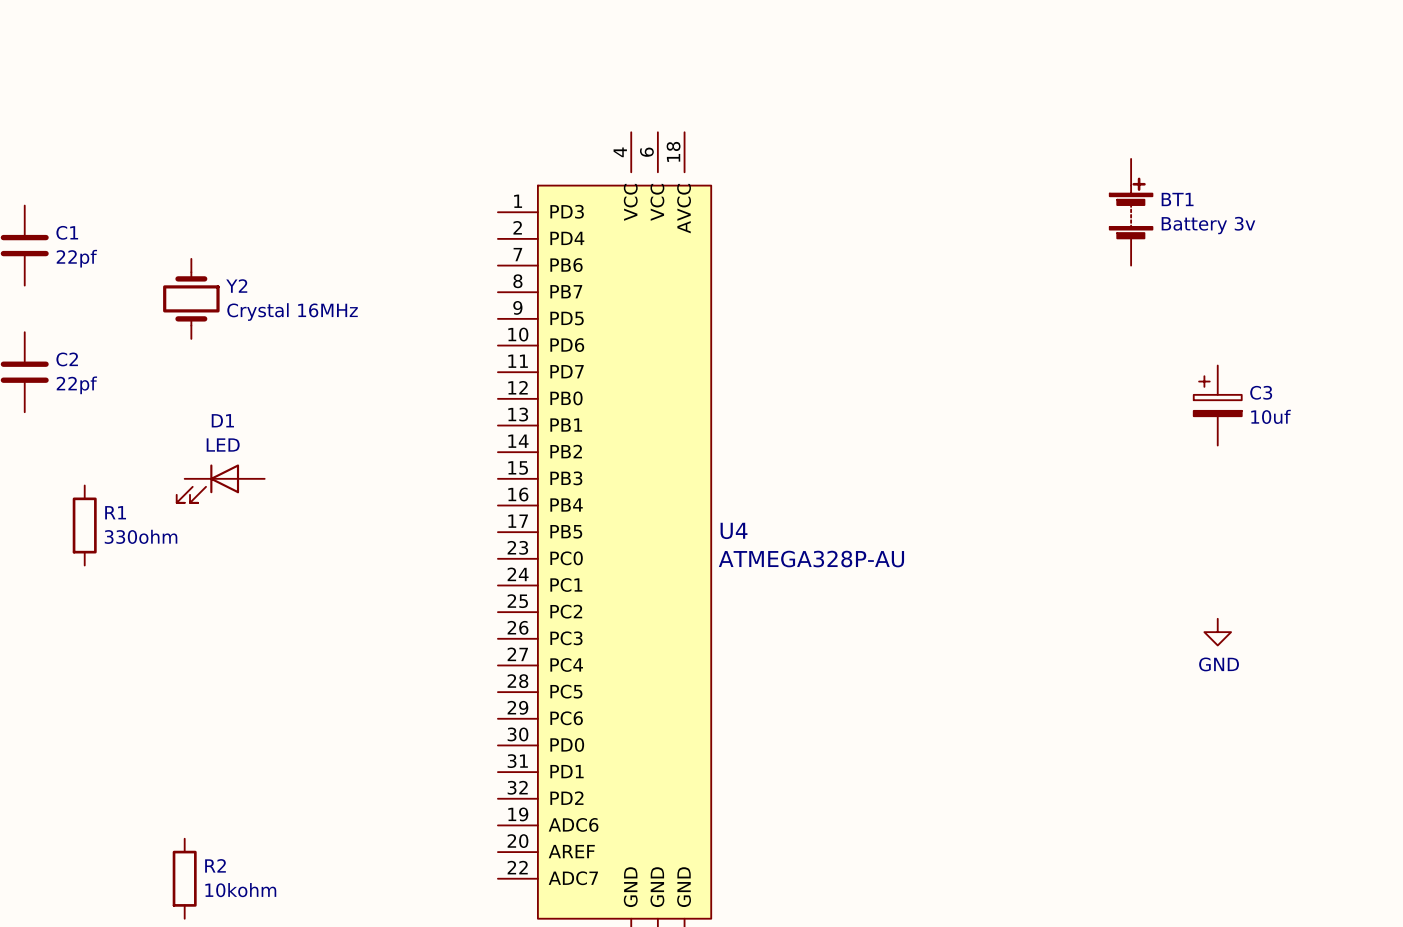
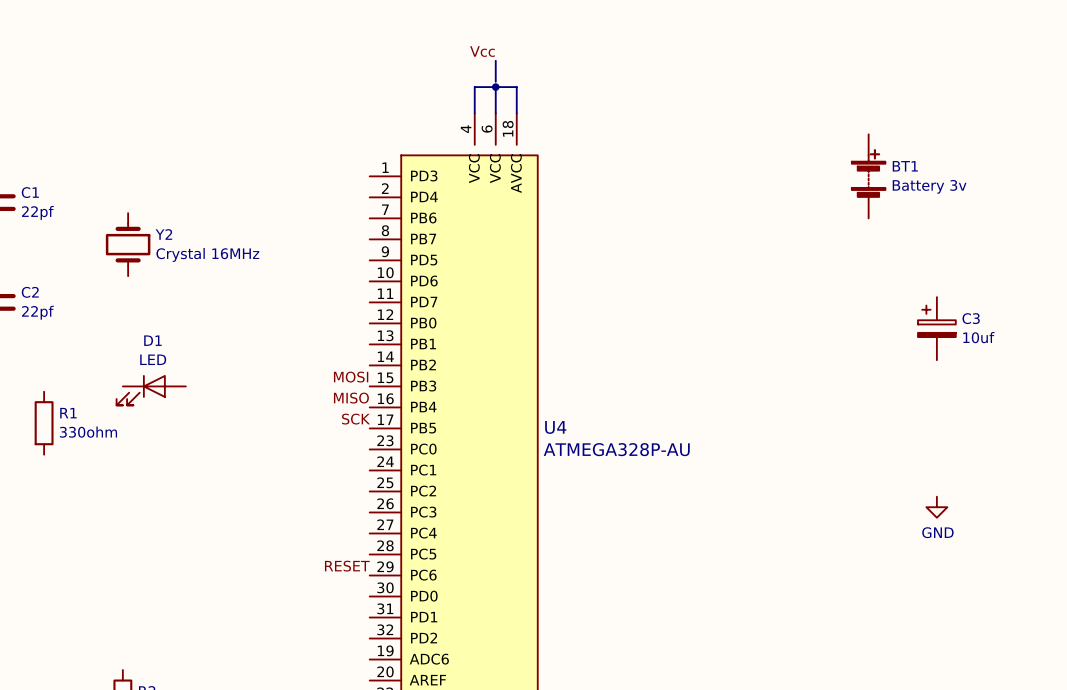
label: none -> Vcc (482, 51)
wire: none -> (495, 60) (495, 81)
wire: none -> (495, 87) (495, 113)
junction: none -> (495, 87)
wire: none -> (474, 113) (474, 87) (516, 87) (516, 113)
label: none -> MOSI (351, 377)
label: none -> MISO (351, 398)
label: none -> SCK (356, 419)
label: none -> RESET (347, 566)

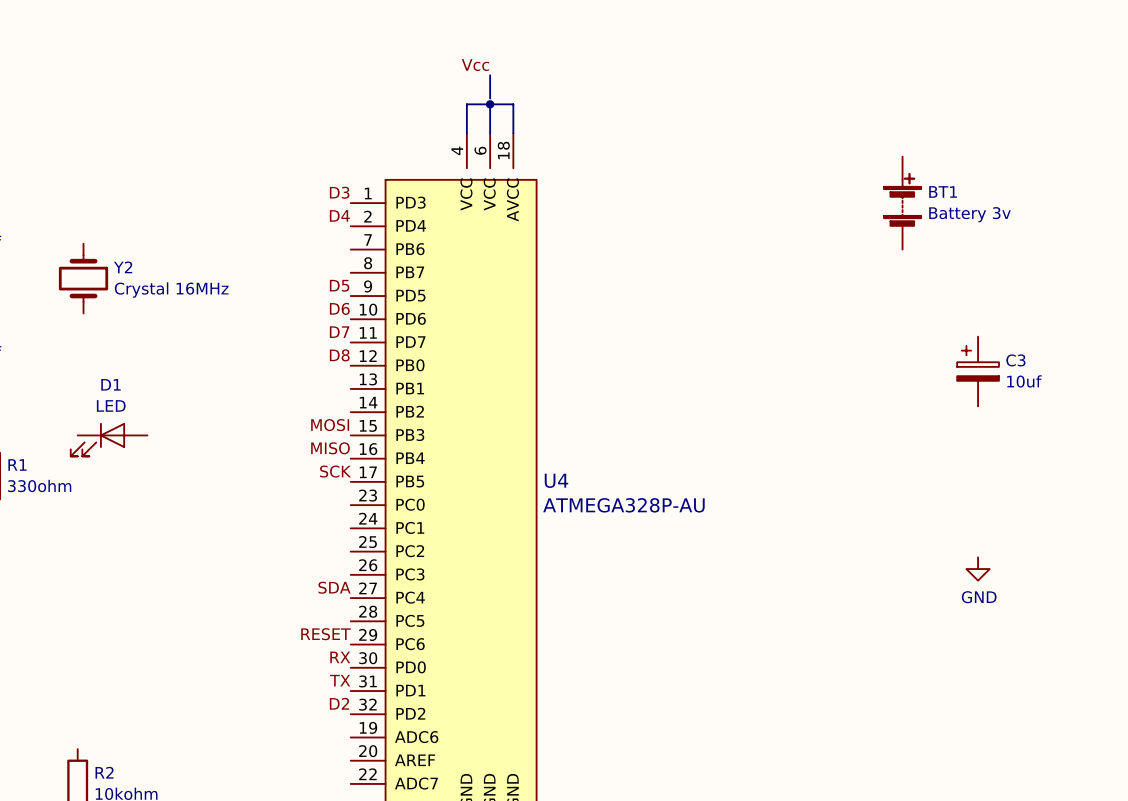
label: none -> D3 (339, 192)
label: none -> D4 (339, 215)
label: none -> D5 (339, 285)
label: none -> D6 (339, 308)
label: none -> D7 (339, 332)
label: none -> D8 (339, 355)
label: none -> SDA (334, 587)
label: none -> RX (340, 657)
label: none -> TX (340, 680)
label: none -> D2 (339, 703)

